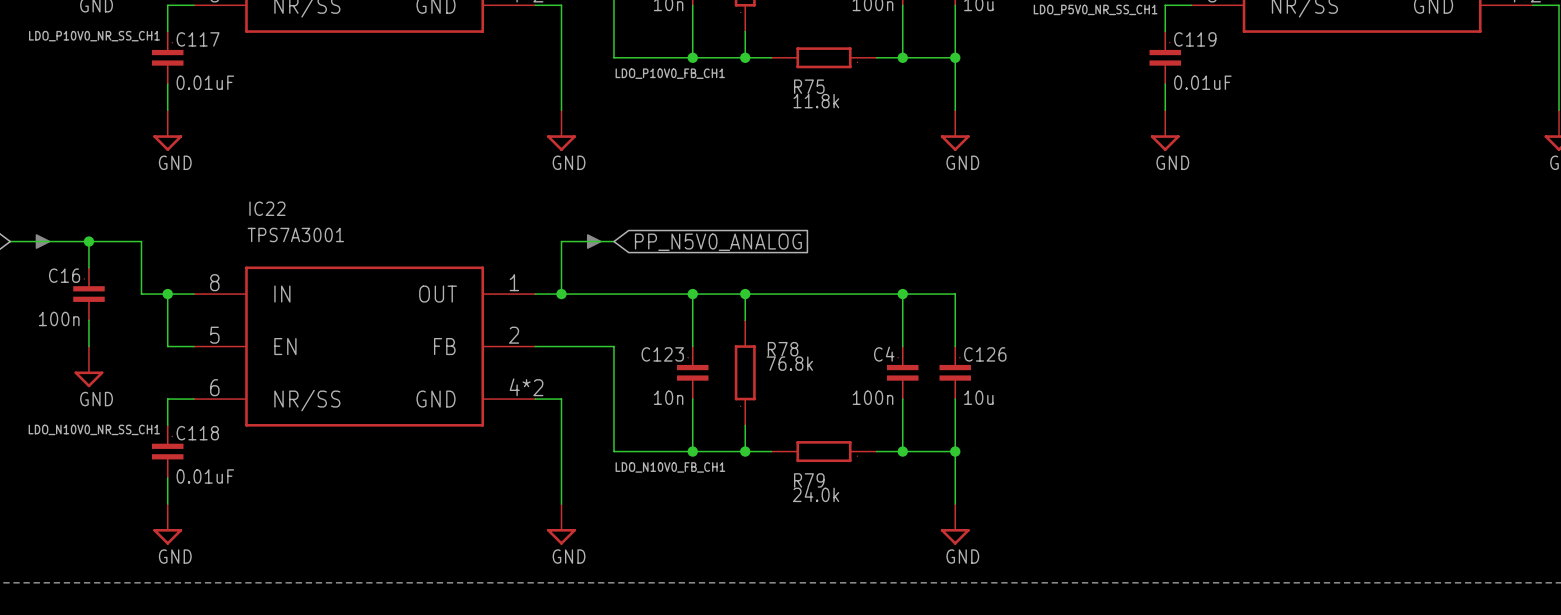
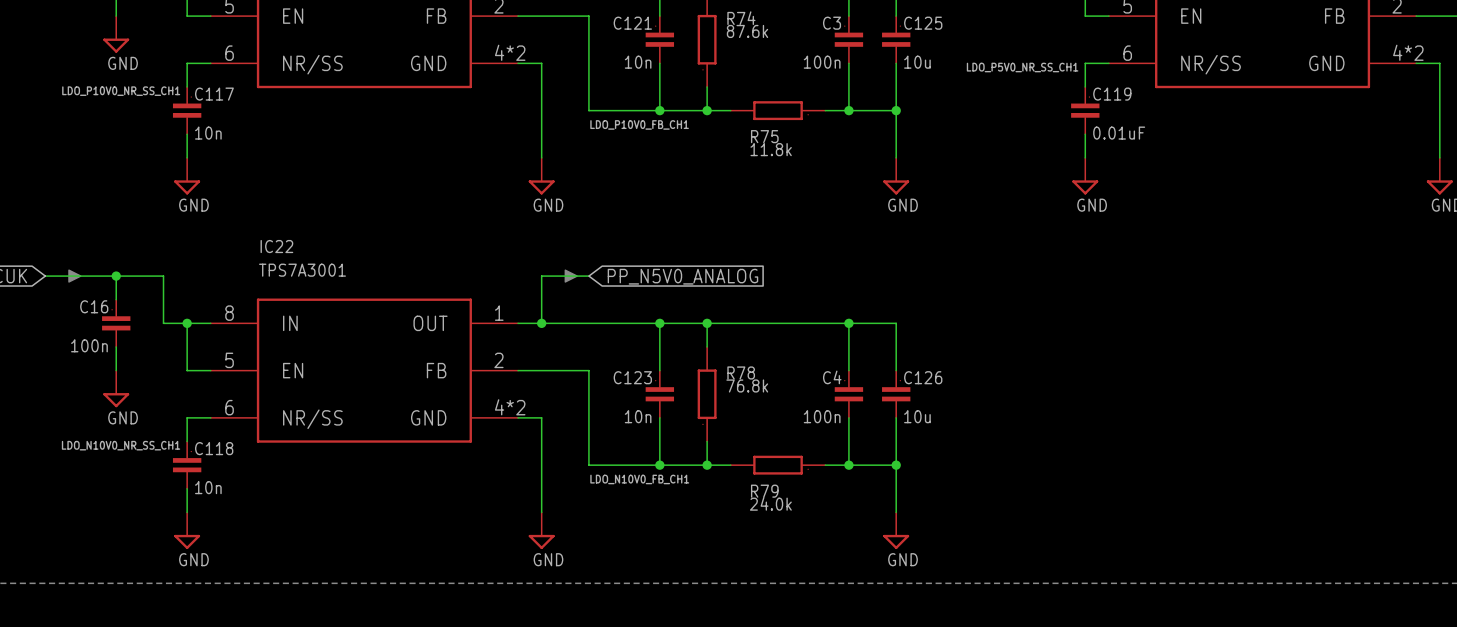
C117 value: 0.01uF (205, 82) -> 10n (208, 133)
C118 value: 0.01uF (205, 476) -> 10n (208, 487)

